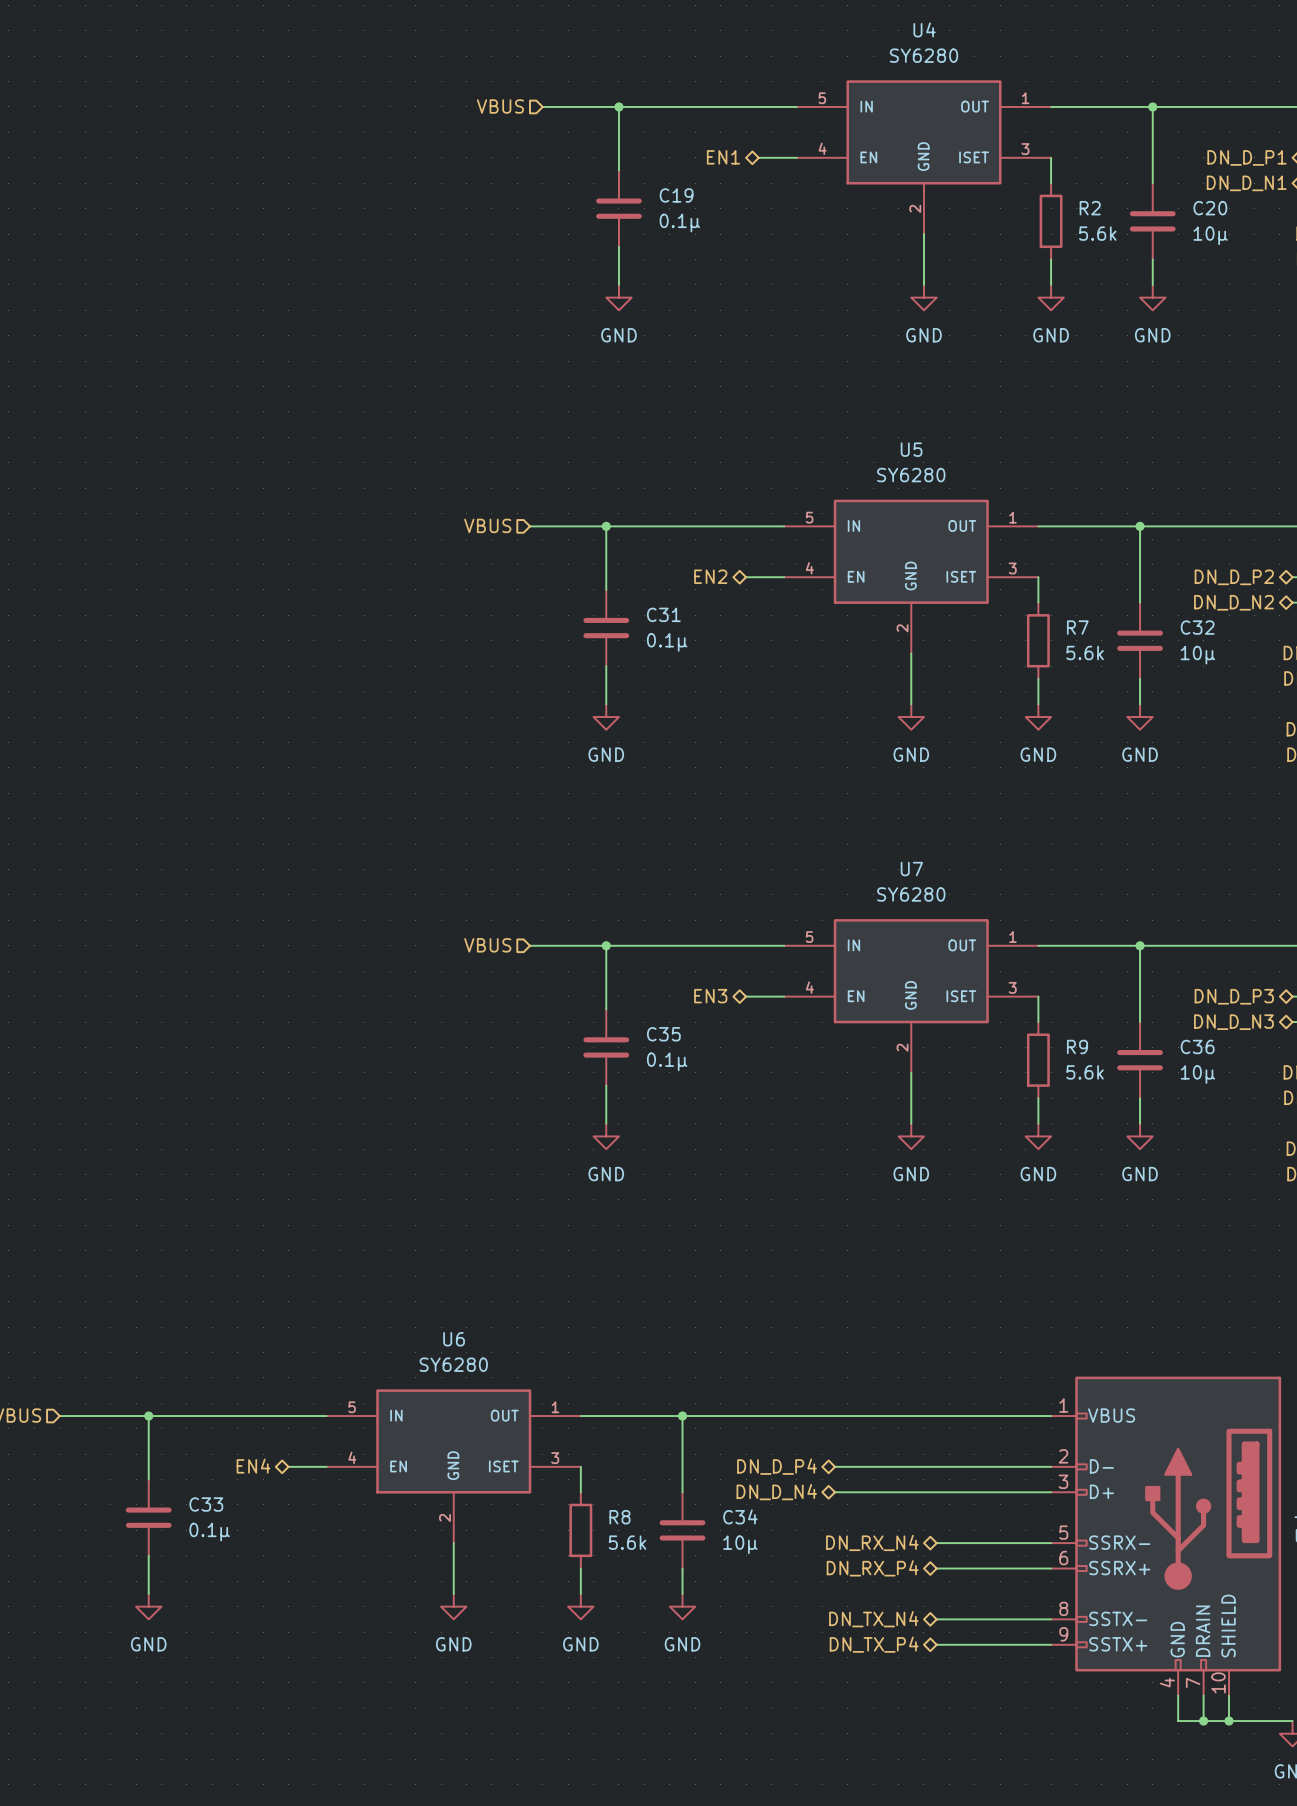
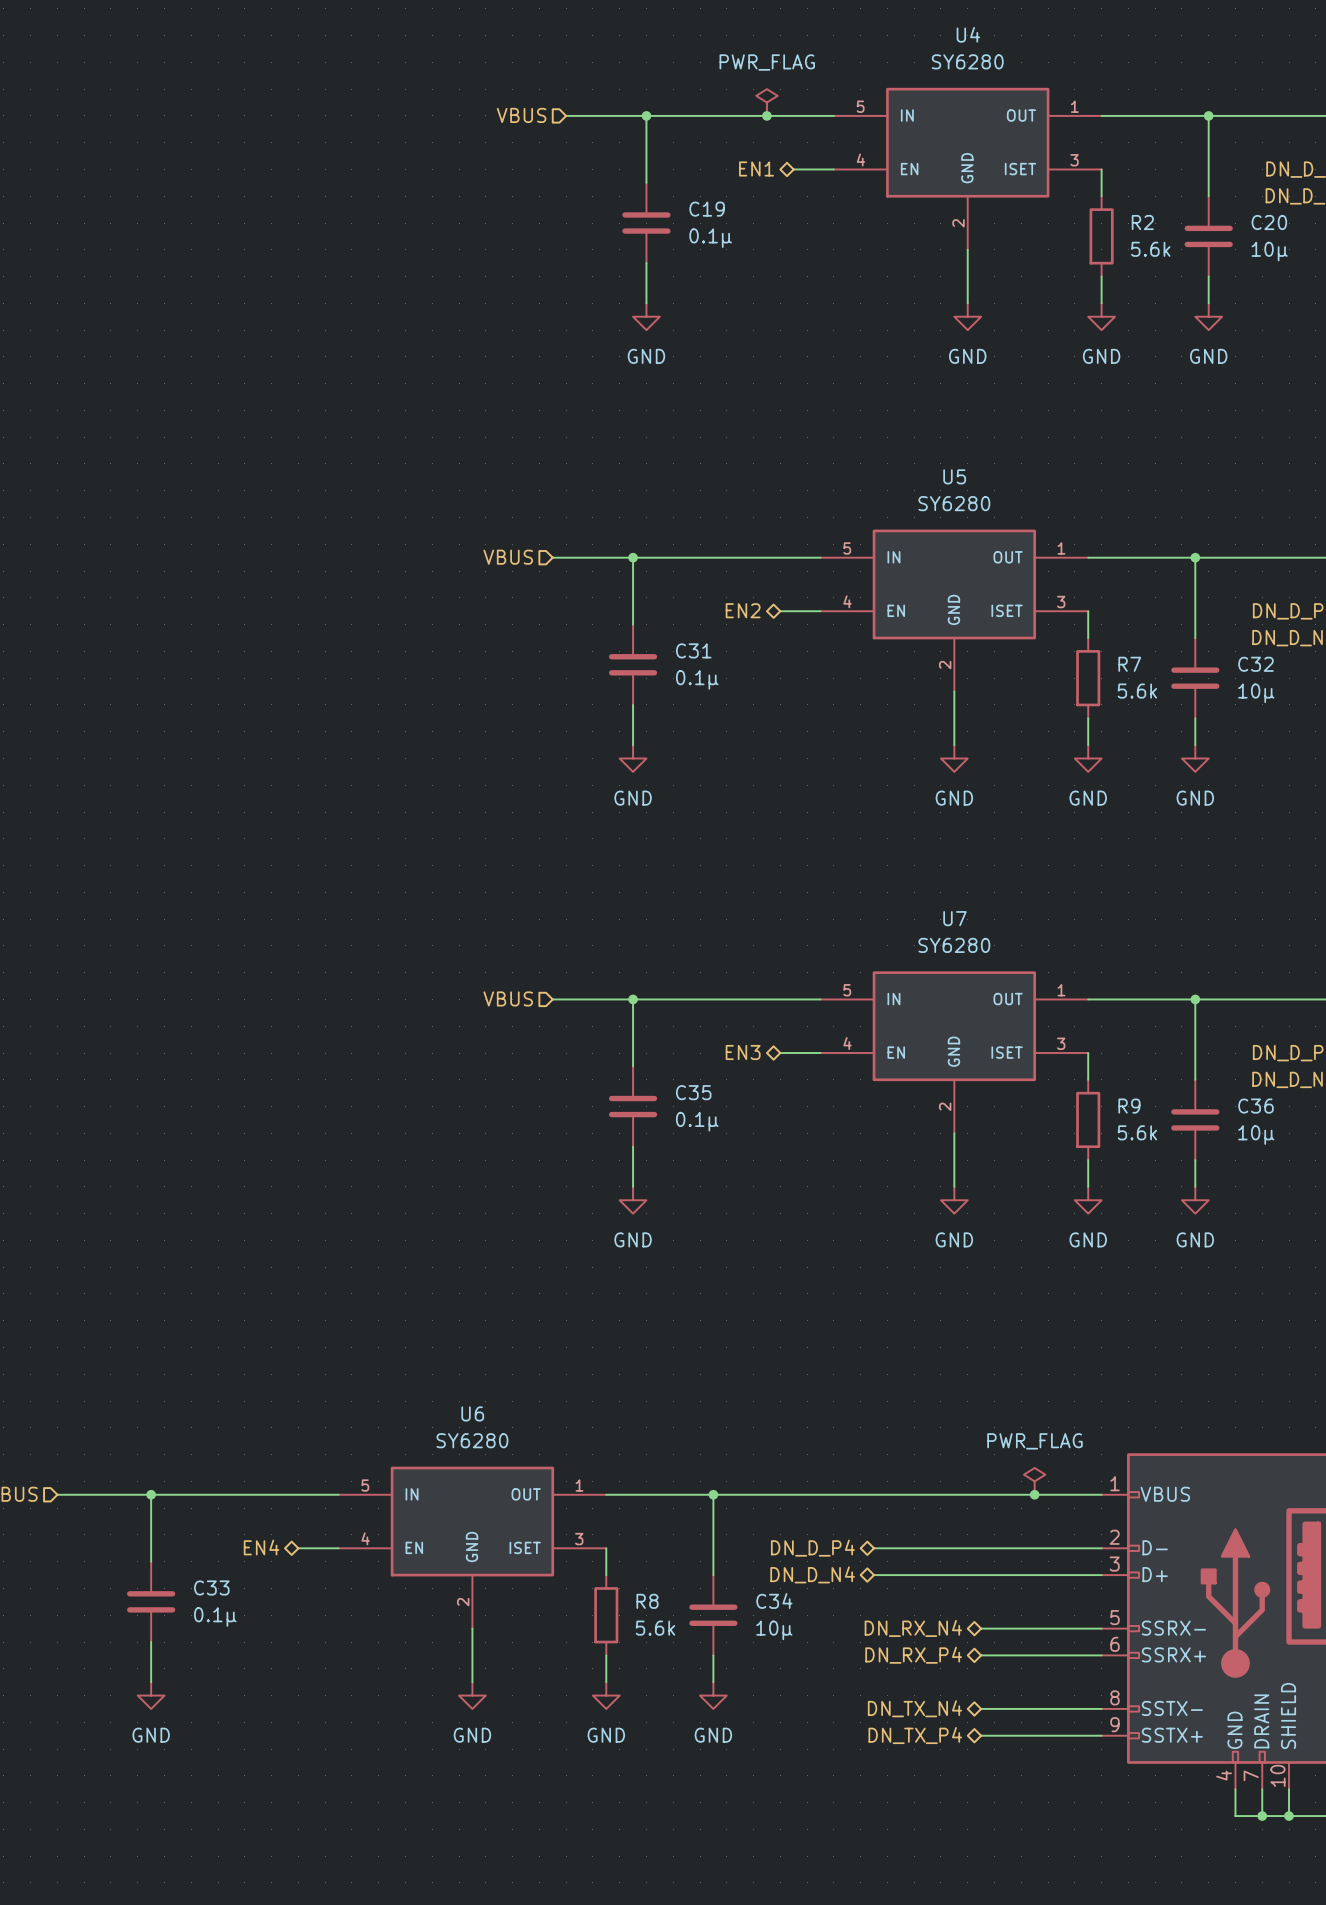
power symbol: none -> PWR_FLAG (766, 102)
junction: none -> (766, 115)
power symbol: none -> PWR_FLAG (1034, 1481)
junction: none -> (1034, 1494)

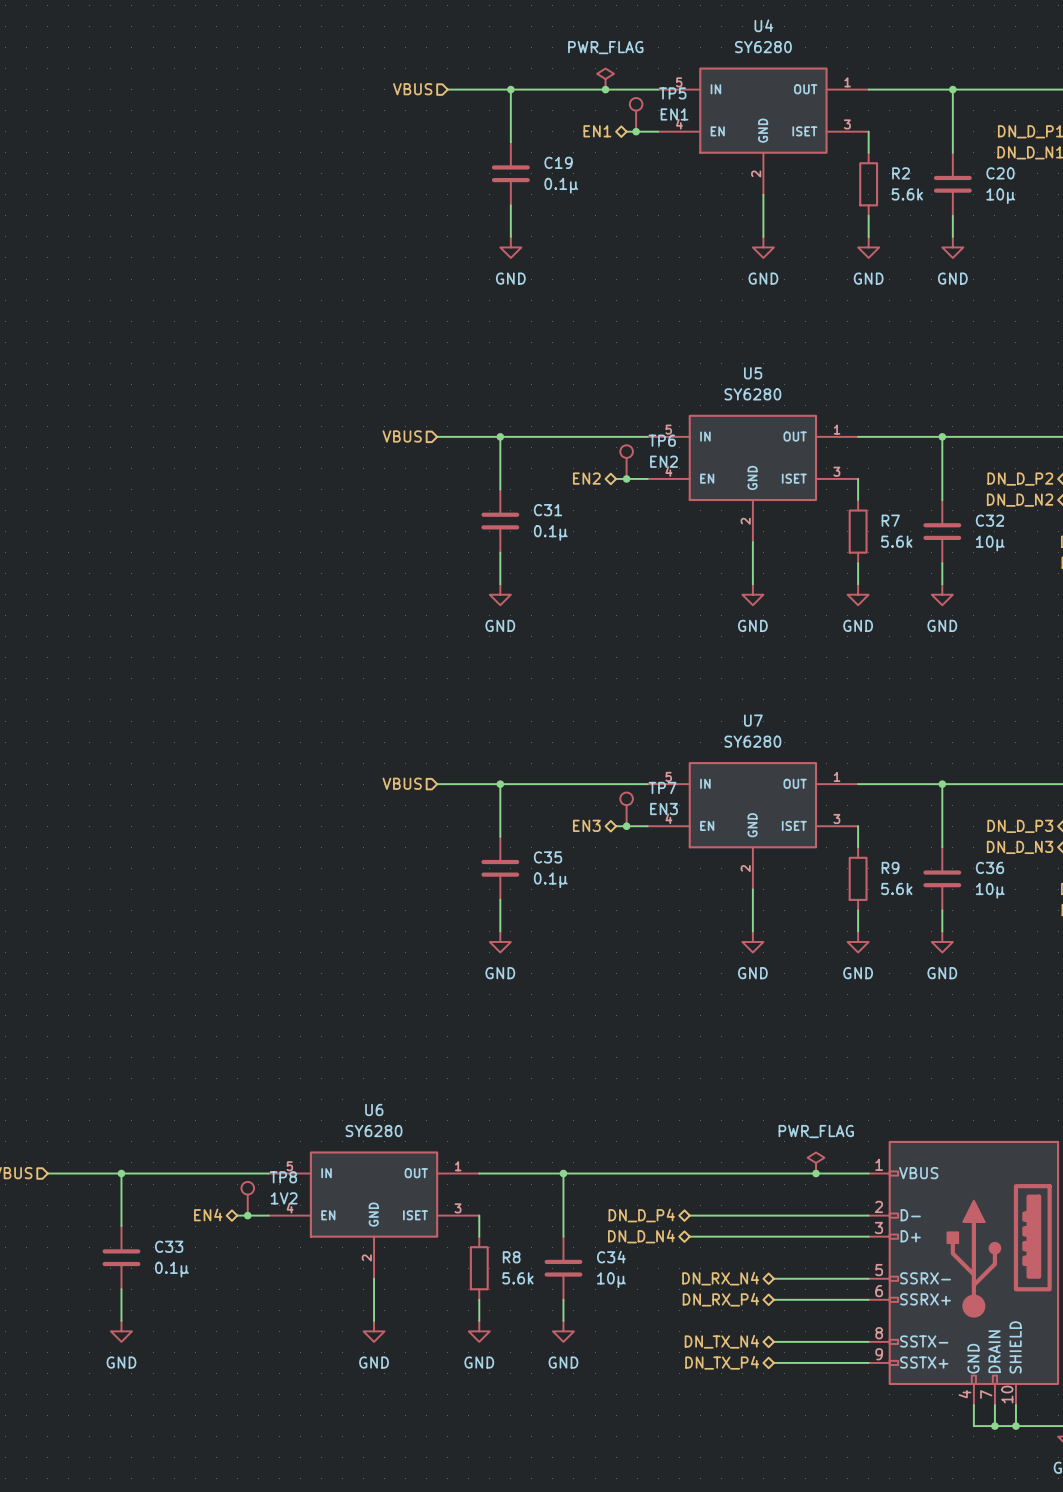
TP5: none -> EN1 (636, 114)
junction: none -> (636, 131)
TP6: none -> EN2 (626, 462)
junction: none -> (626, 478)
TP7: none -> EN3 (626, 809)
junction: none -> (626, 826)
TP8: none -> 1V2 (247, 1198)
junction: none -> (247, 1215)

